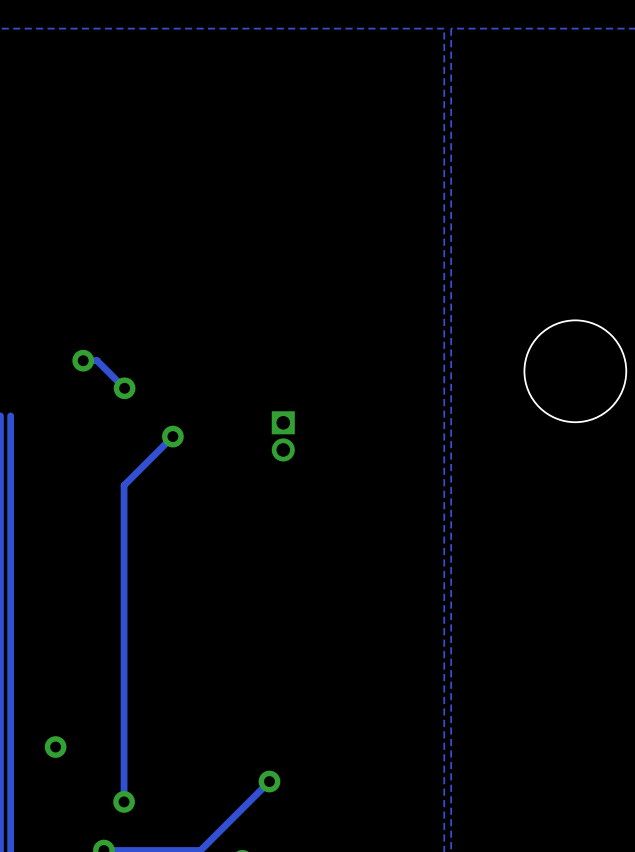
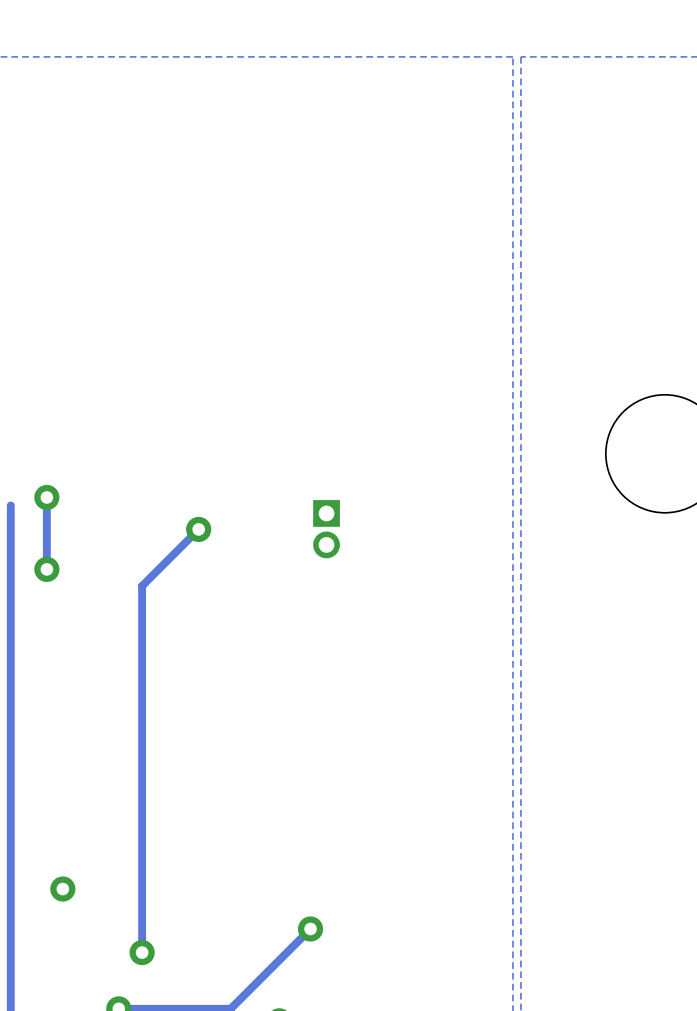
track: (83, 360) (97, 360) (124, 388) -> none
via: (83, 360) -> none
via: (124, 388) -> none
track: none -> (46, 497) (46, 569)
via: none -> (46, 497)
via: none -> (46, 569)

